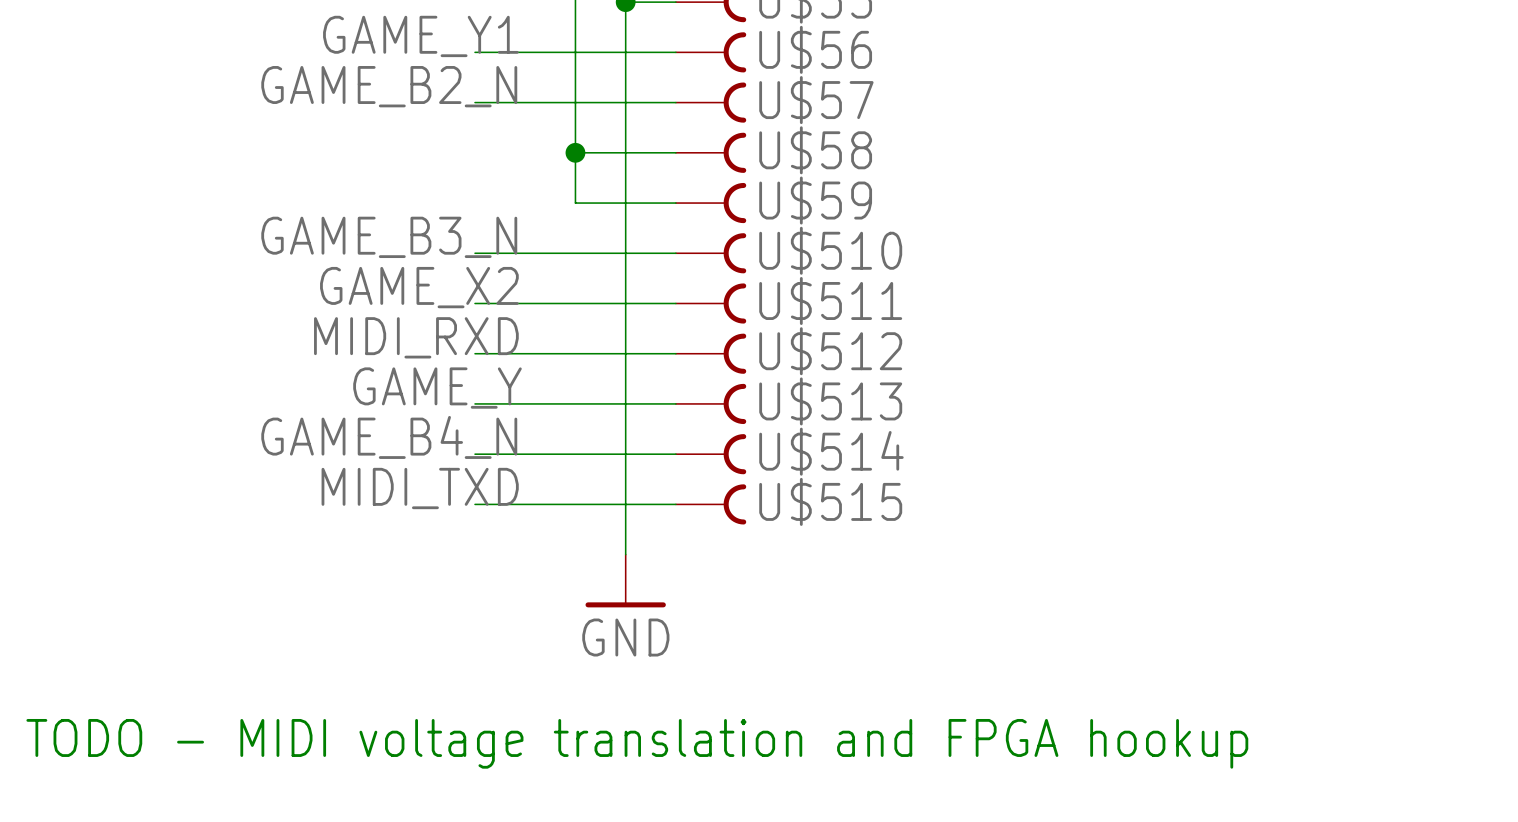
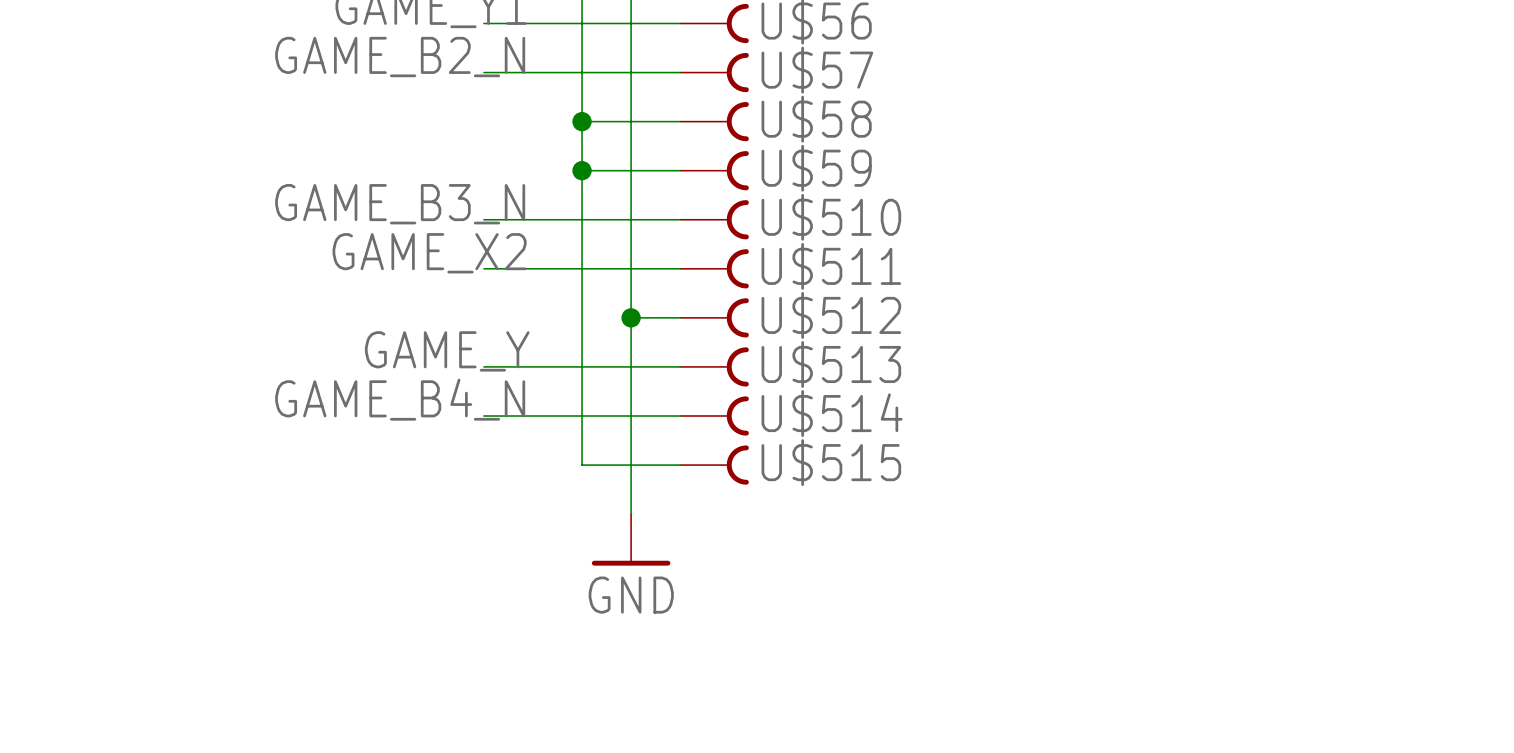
junction: none -> (582, 170)
label: MIDI_RXD (416, 337) -> none
wire: (475, 353) (625, 353) -> none
junction: none -> (631, 317)
label: MIDI_TXD (420, 488) -> none
wire: (475, 504) (575, 504) -> (582, 170) (582, 465)
text: TODO - MIDI voltage translation and FPGA hookup (637, 743) -> none

